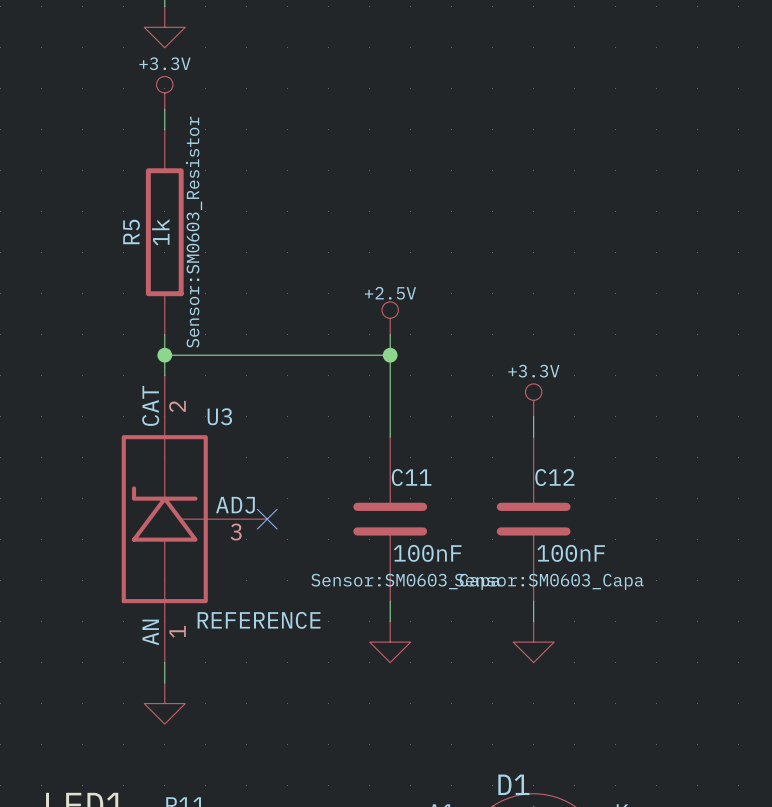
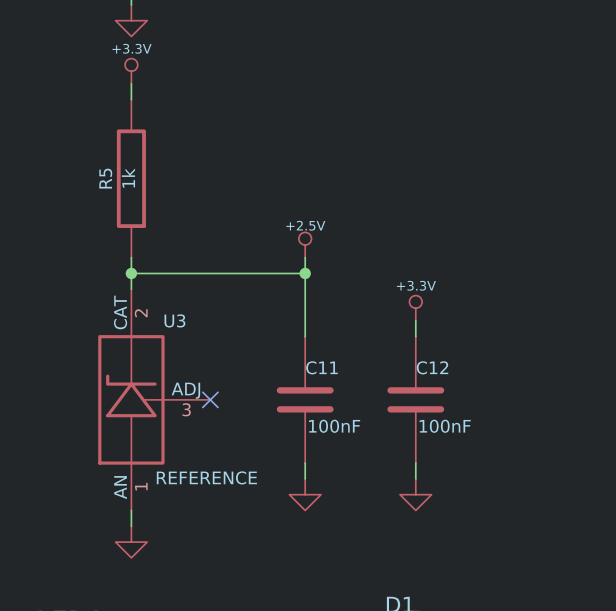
R5 text: Sensor:SM0603_Resistor (194, 232) -> none
C11 text: Sensor:SM0603_Capa (405, 581) -> none
C12 text: Sensor:SM0603_Capa (549, 581) -> none

